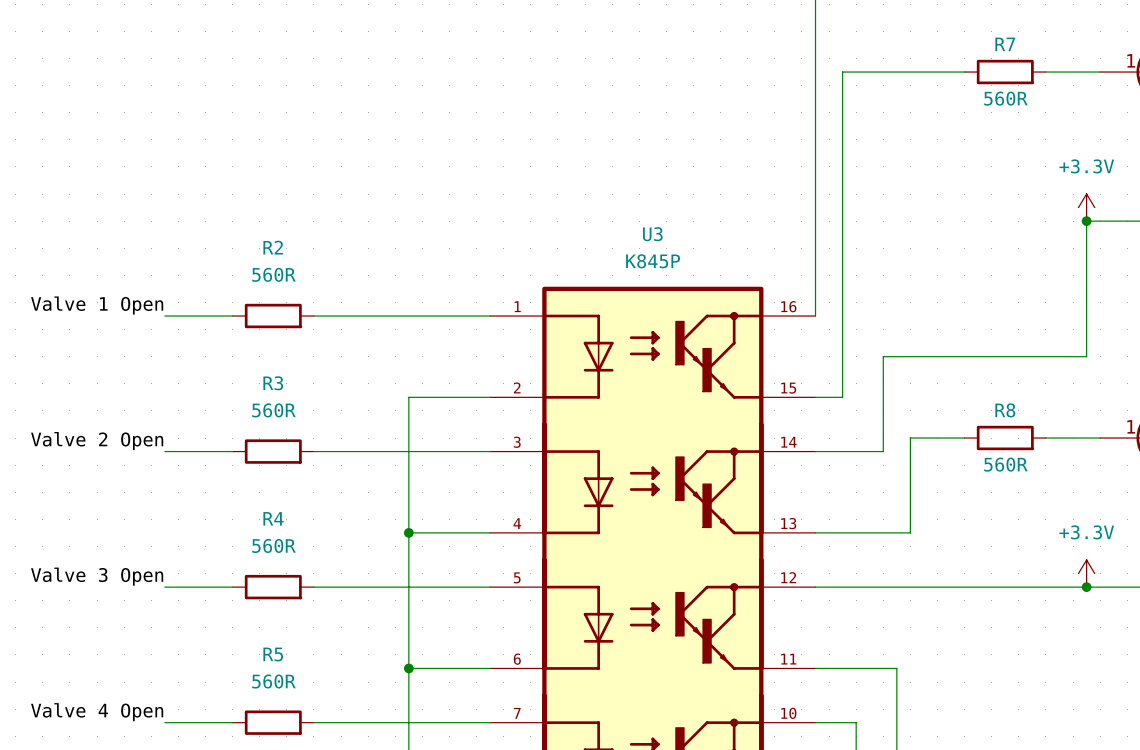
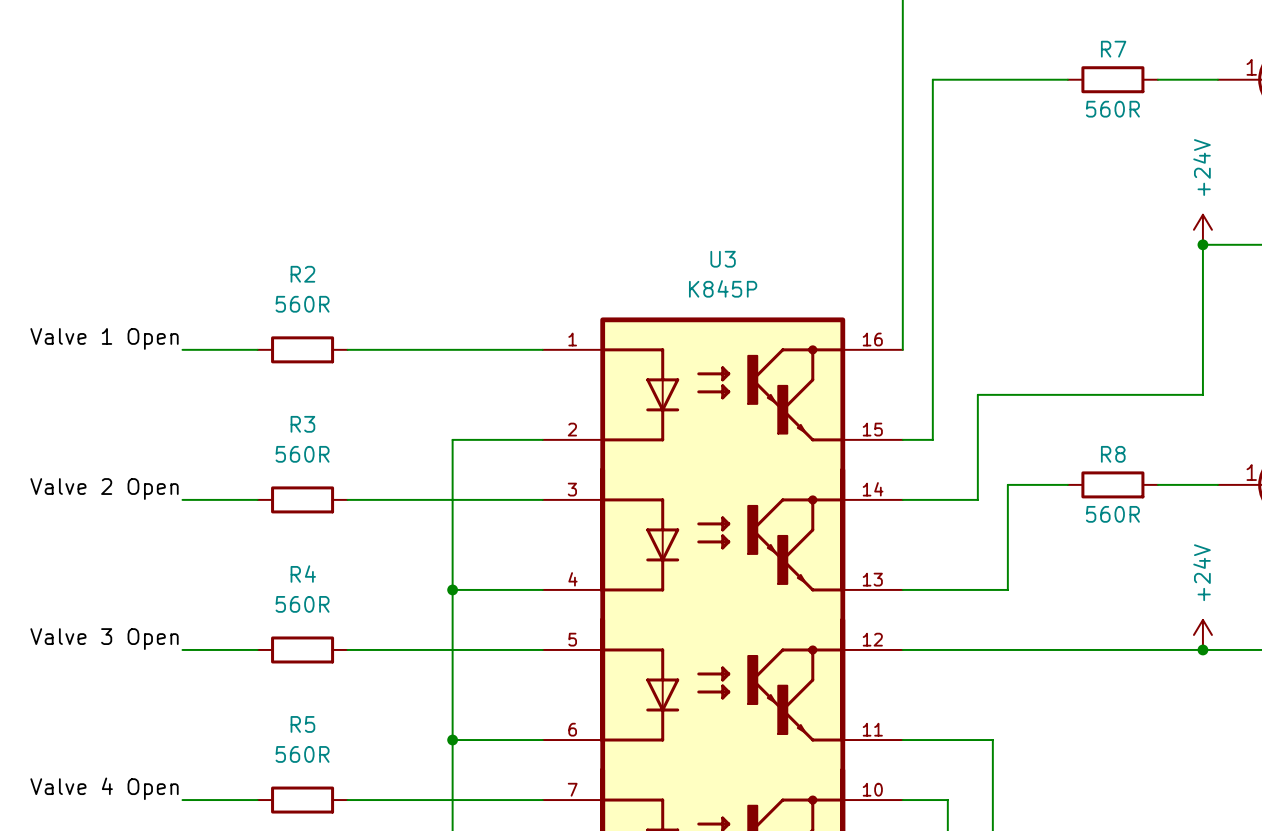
power symbol: +3.3V (1086, 207) -> +24V (1202, 229)
power symbol: +3.3V (1086, 573) -> +24V (1202, 634)

